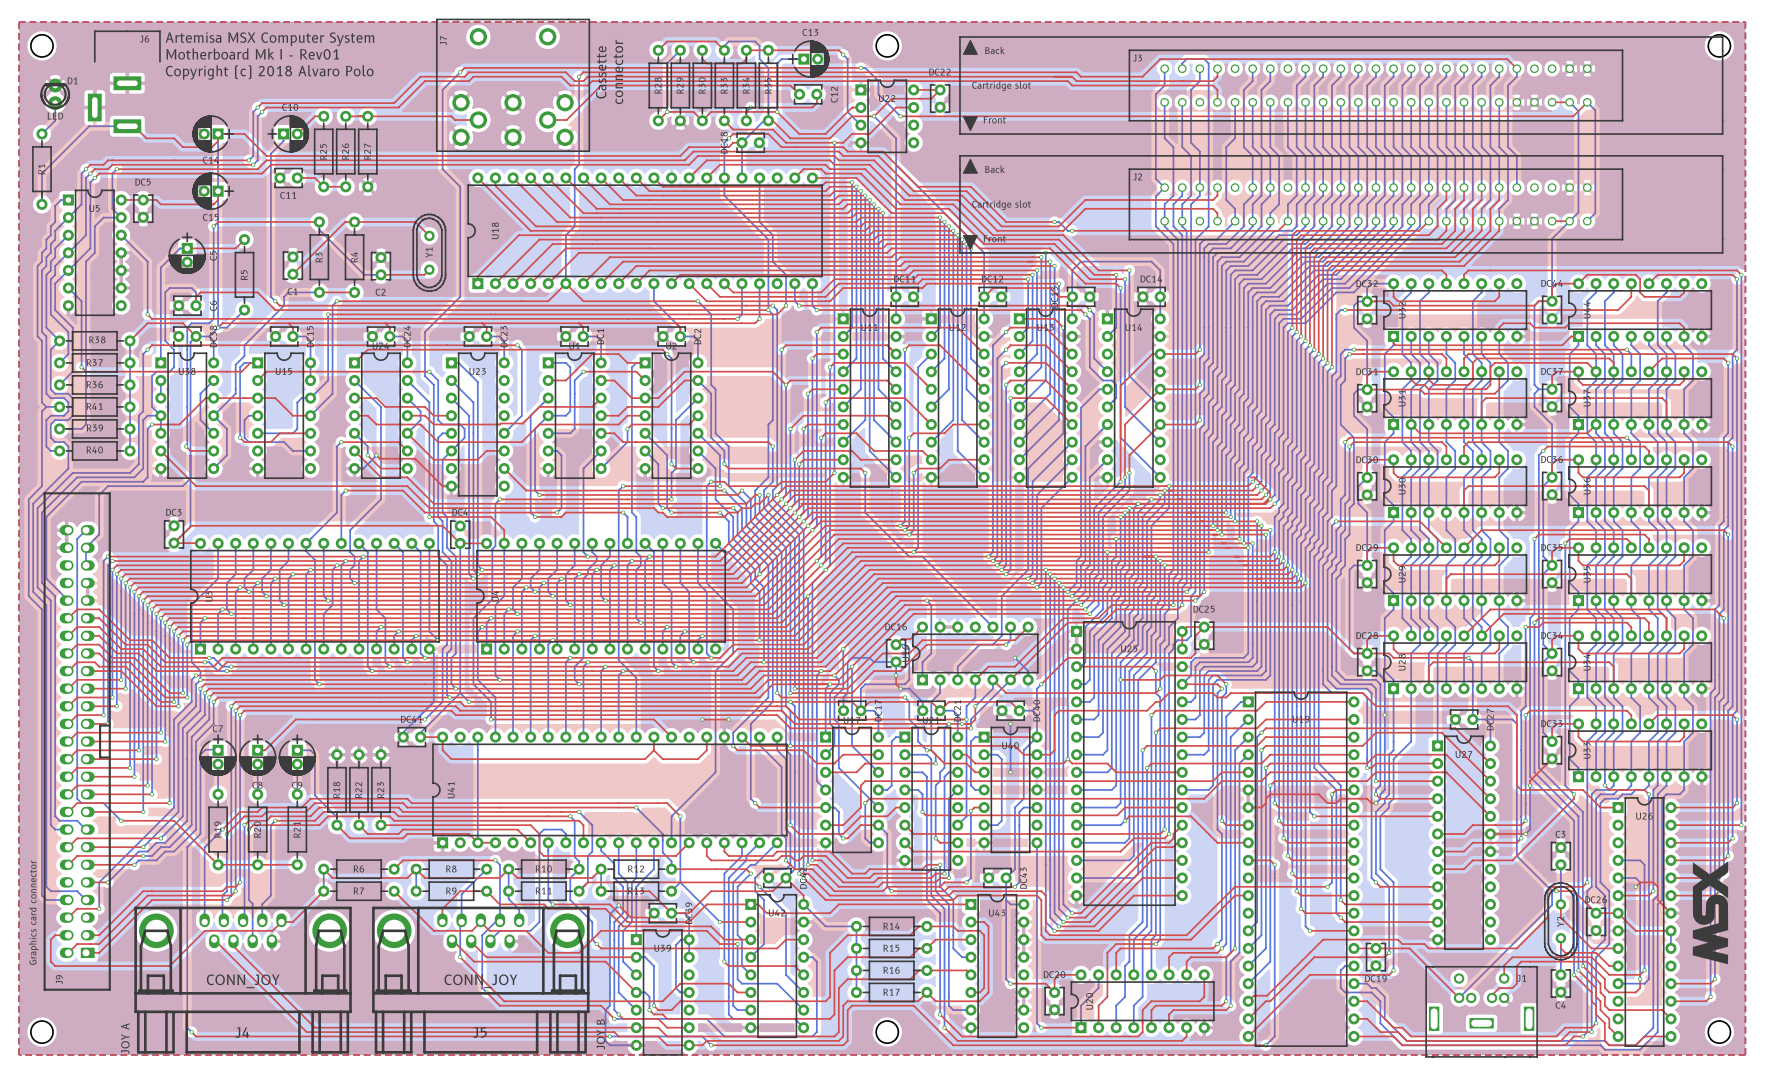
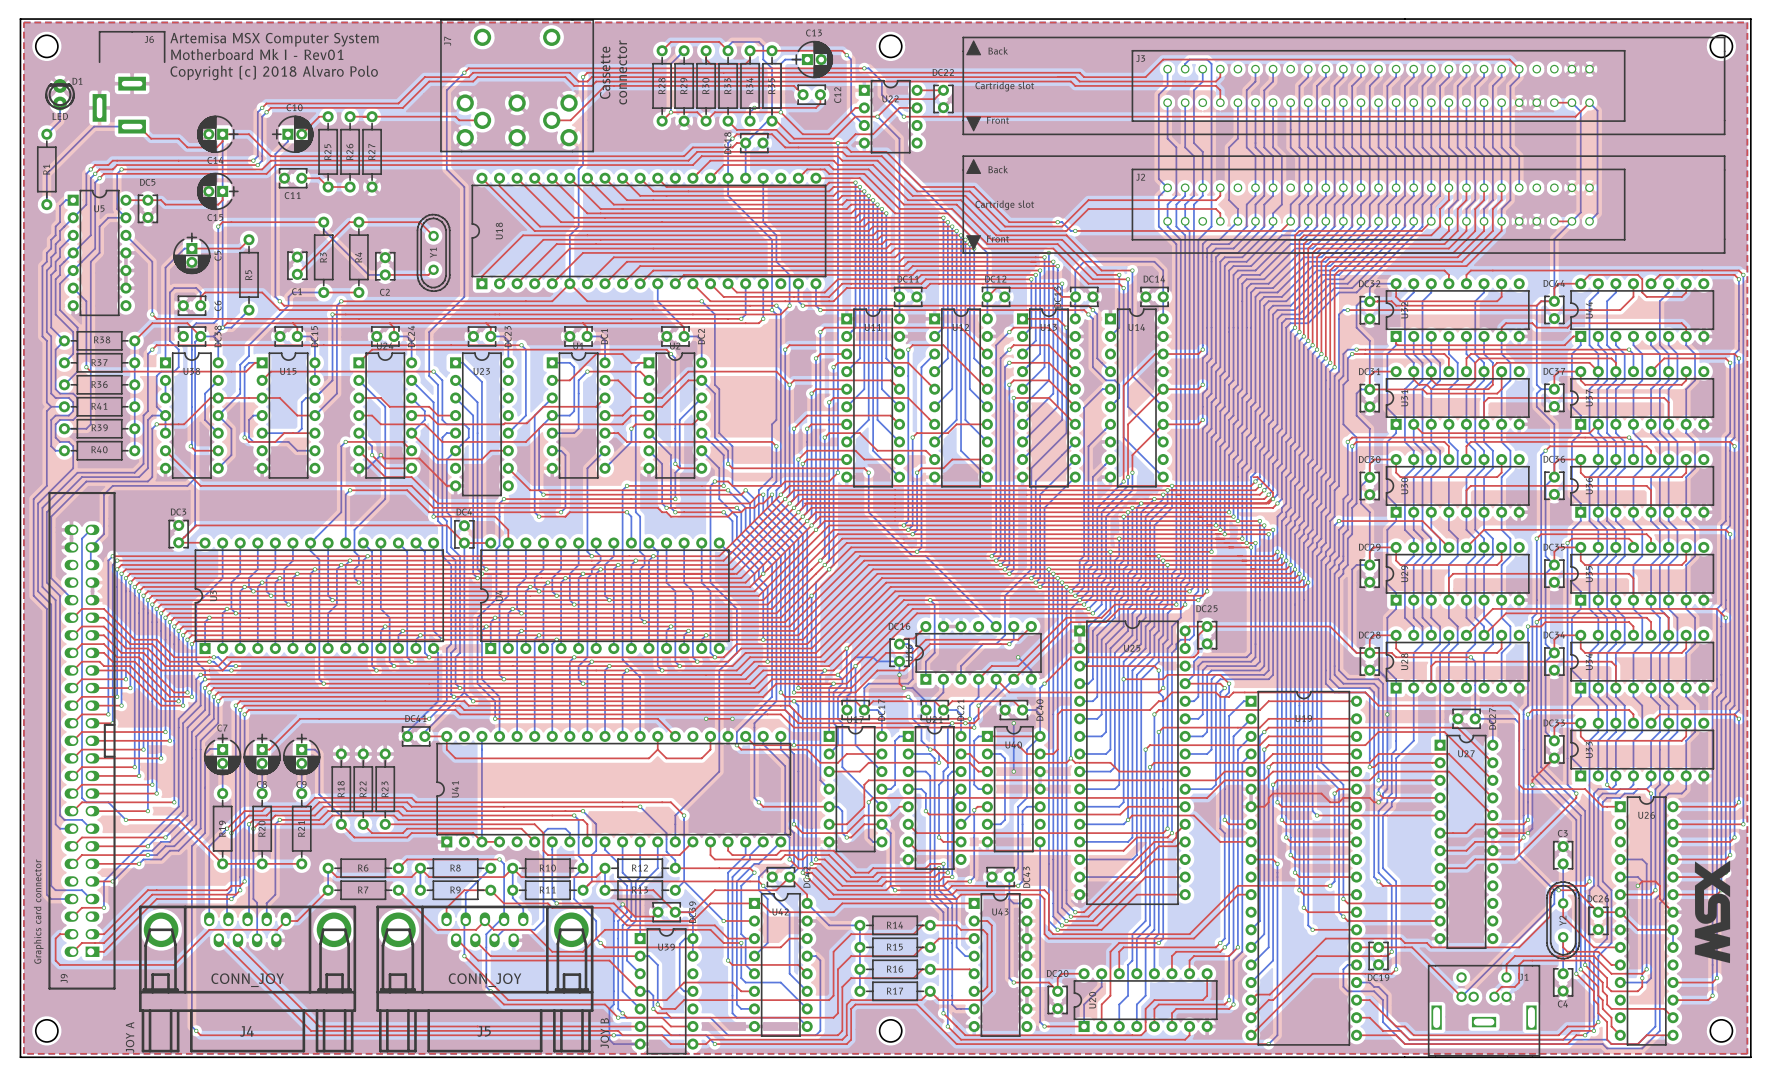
board edge: none -> (20, 19) (1750, 19) (1750, 1057) (20, 1057) (20, 19)

